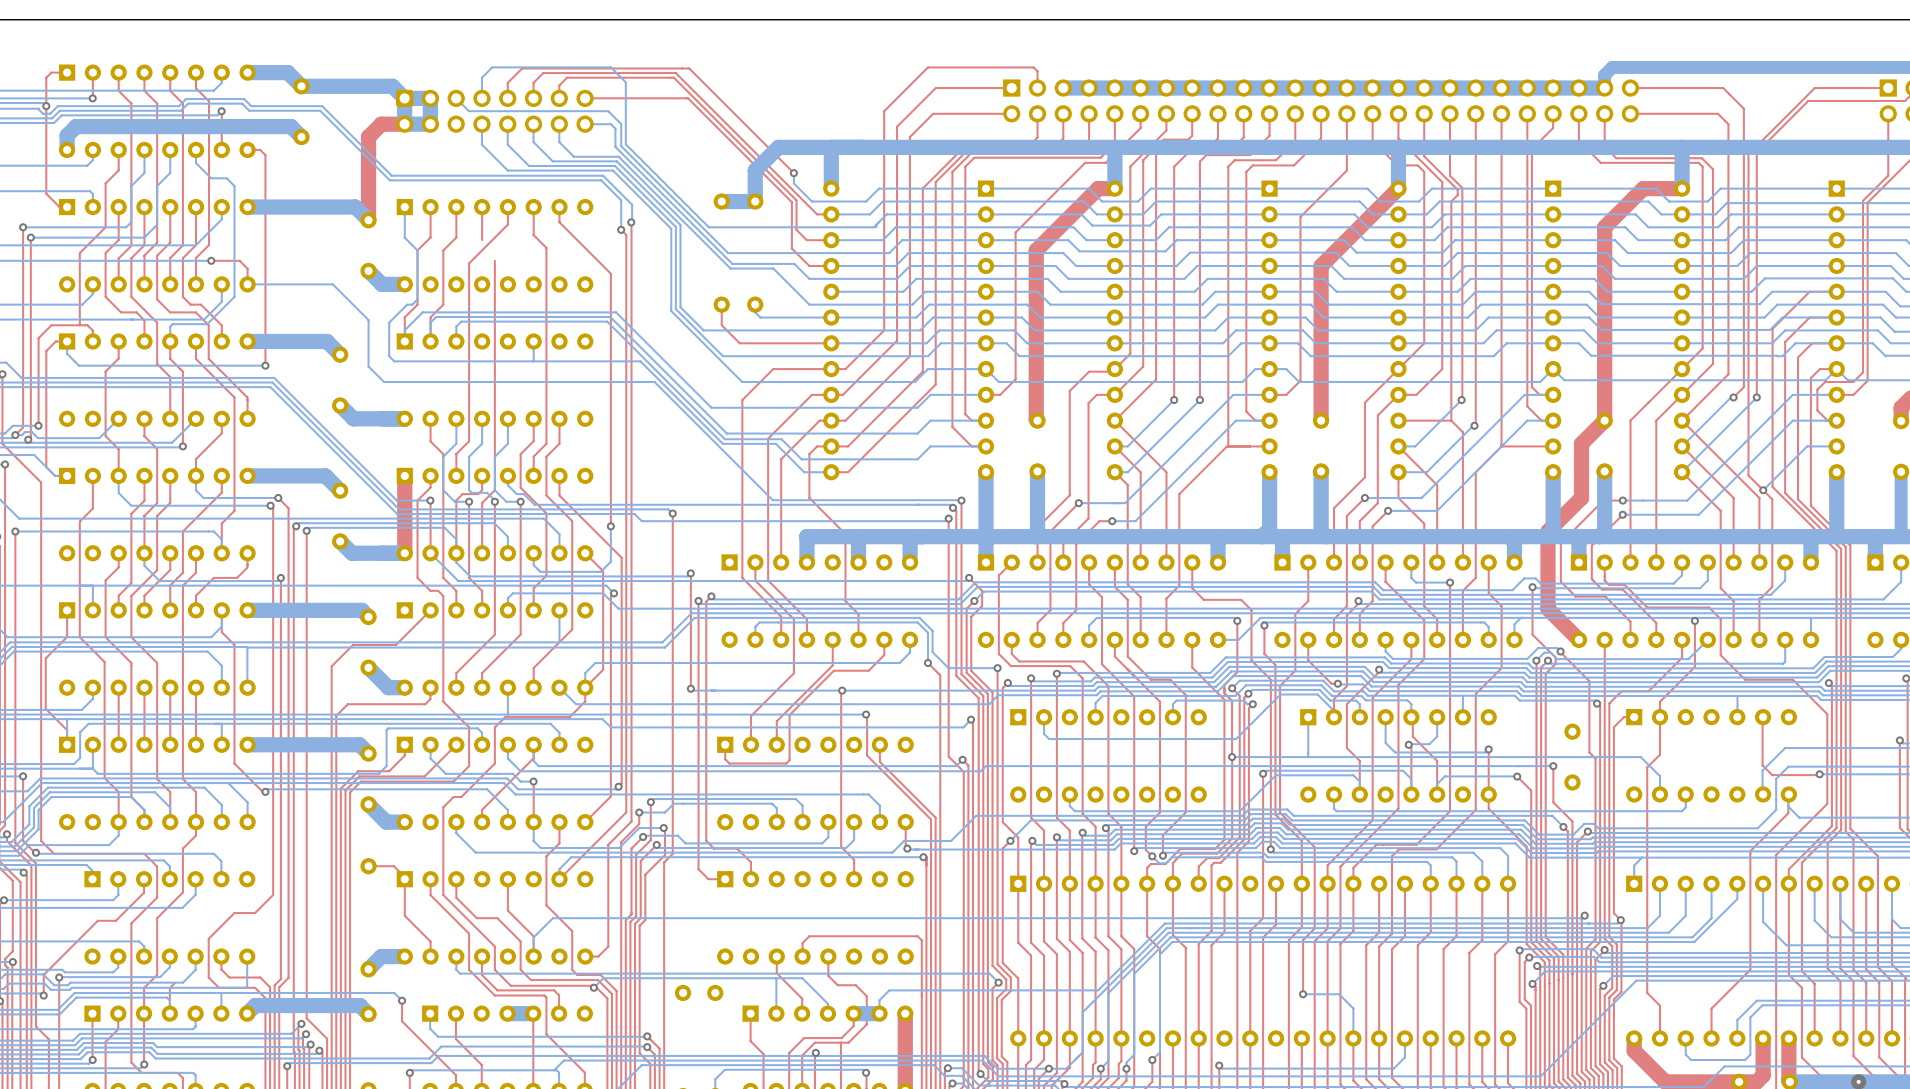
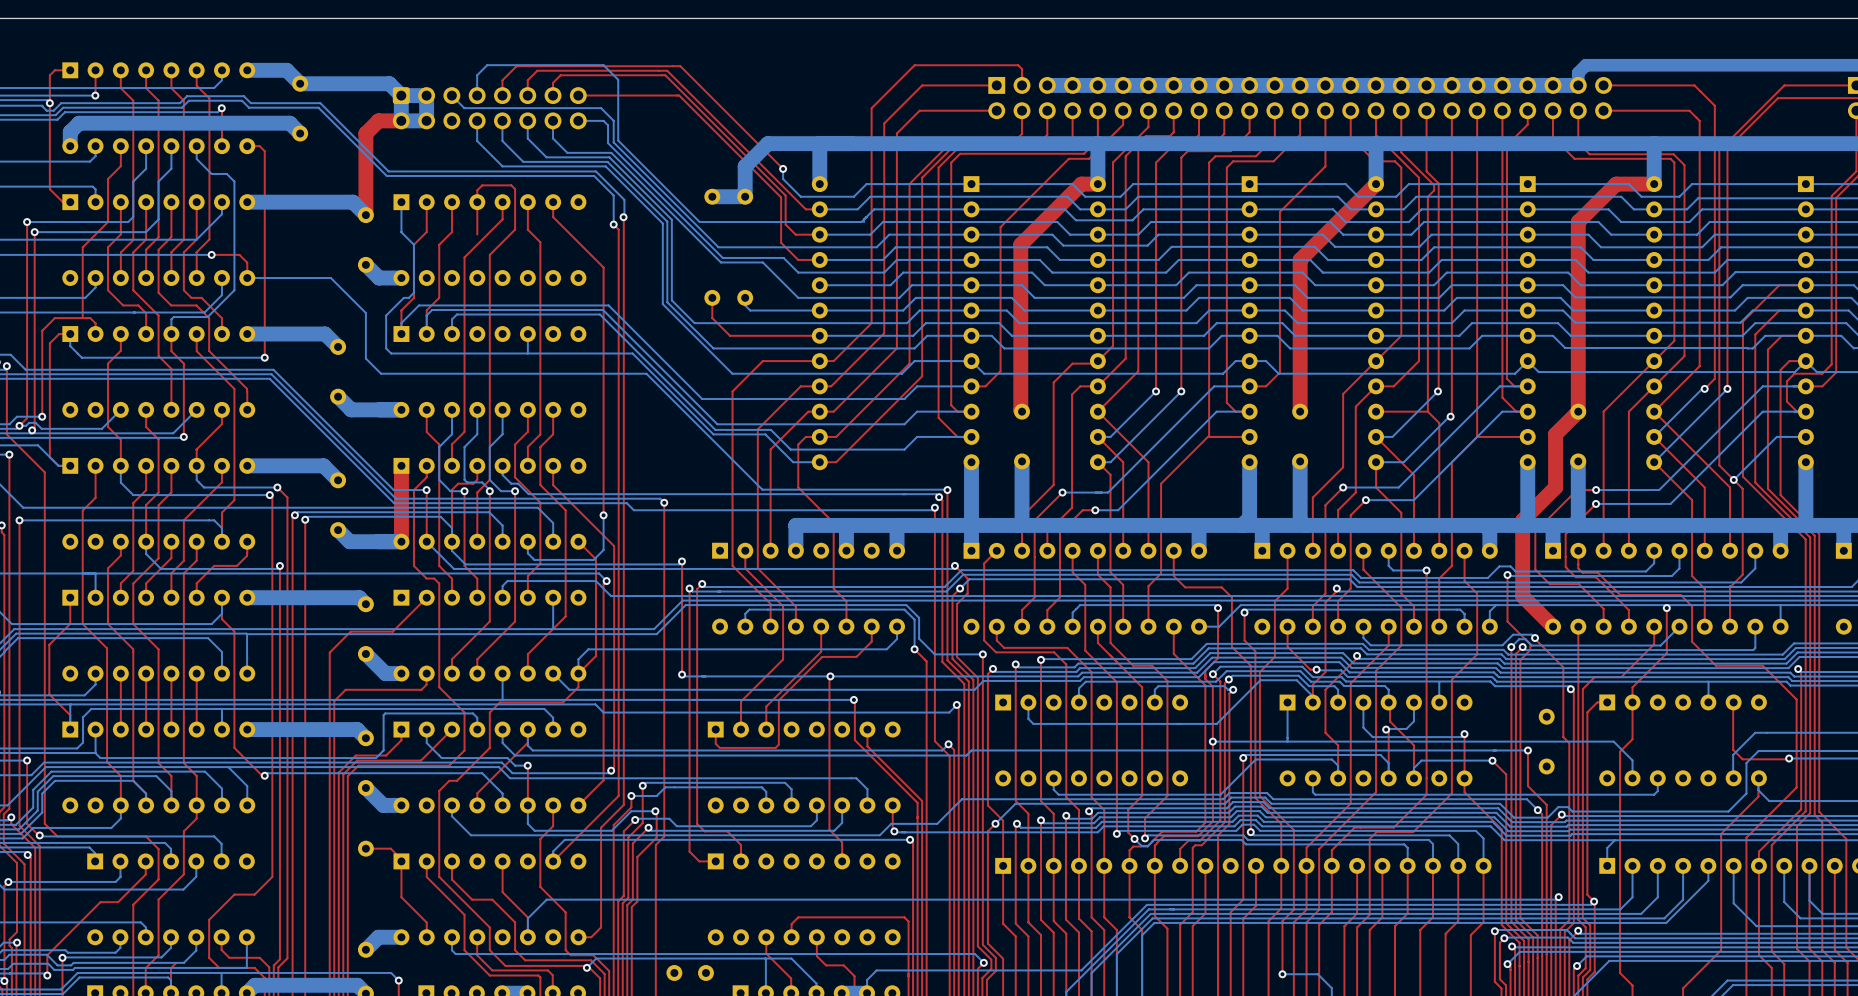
top track: none -> (477, 202) (477, 190) (482, 185) (511, 185) (515, 189) (515, 229) (489, 254)

